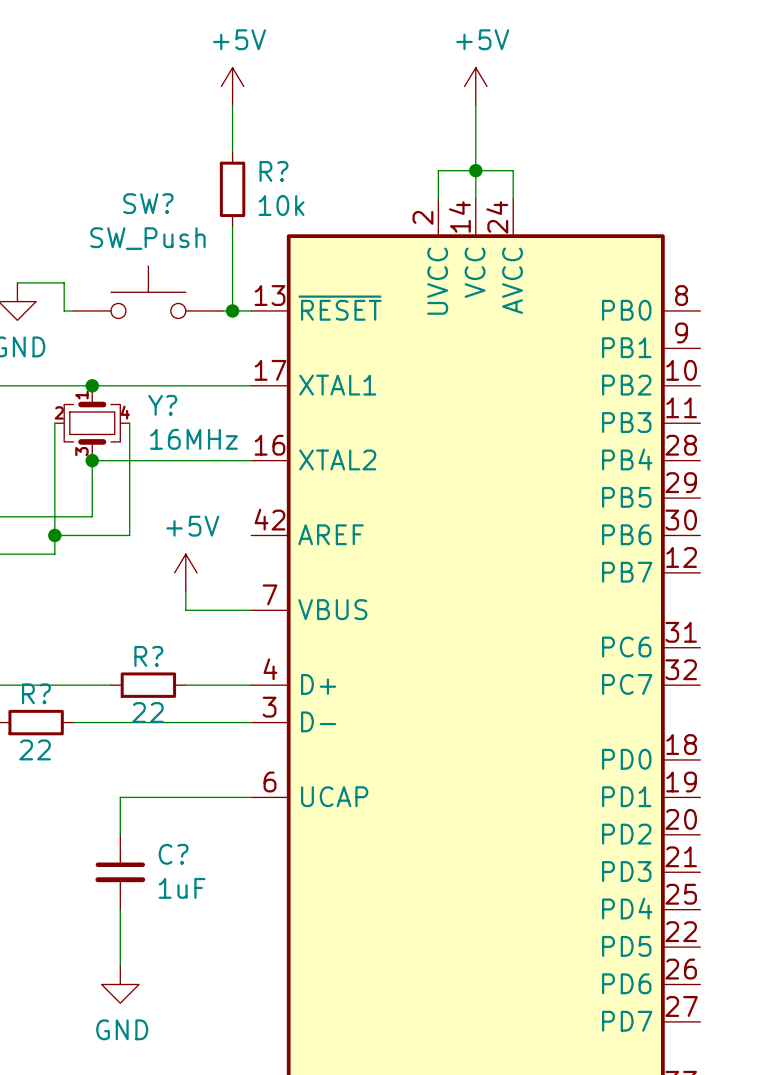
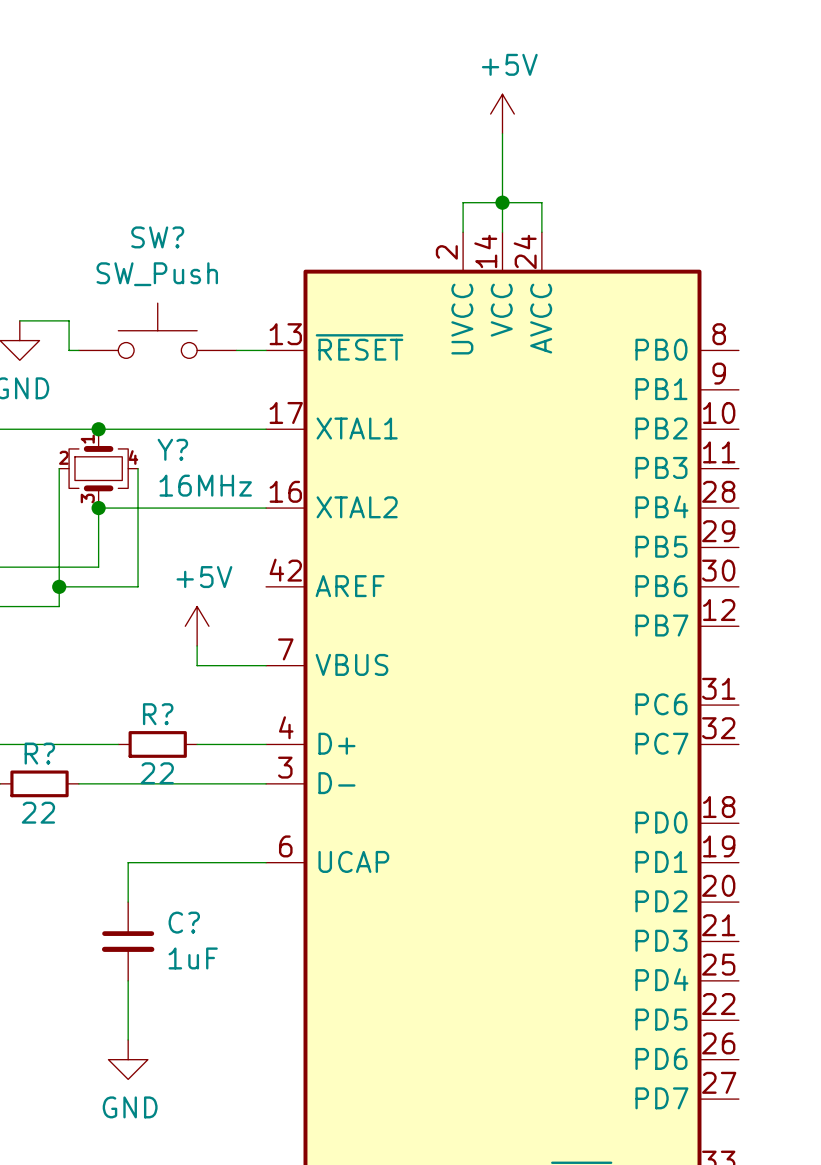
power symbol: +5V (232, 86) -> none
wire: (232, 105) (232, 151) -> none
R?: 10k (232, 189) -> none
wire: (232, 226) (232, 310) -> none
junction: (232, 310) -> none

